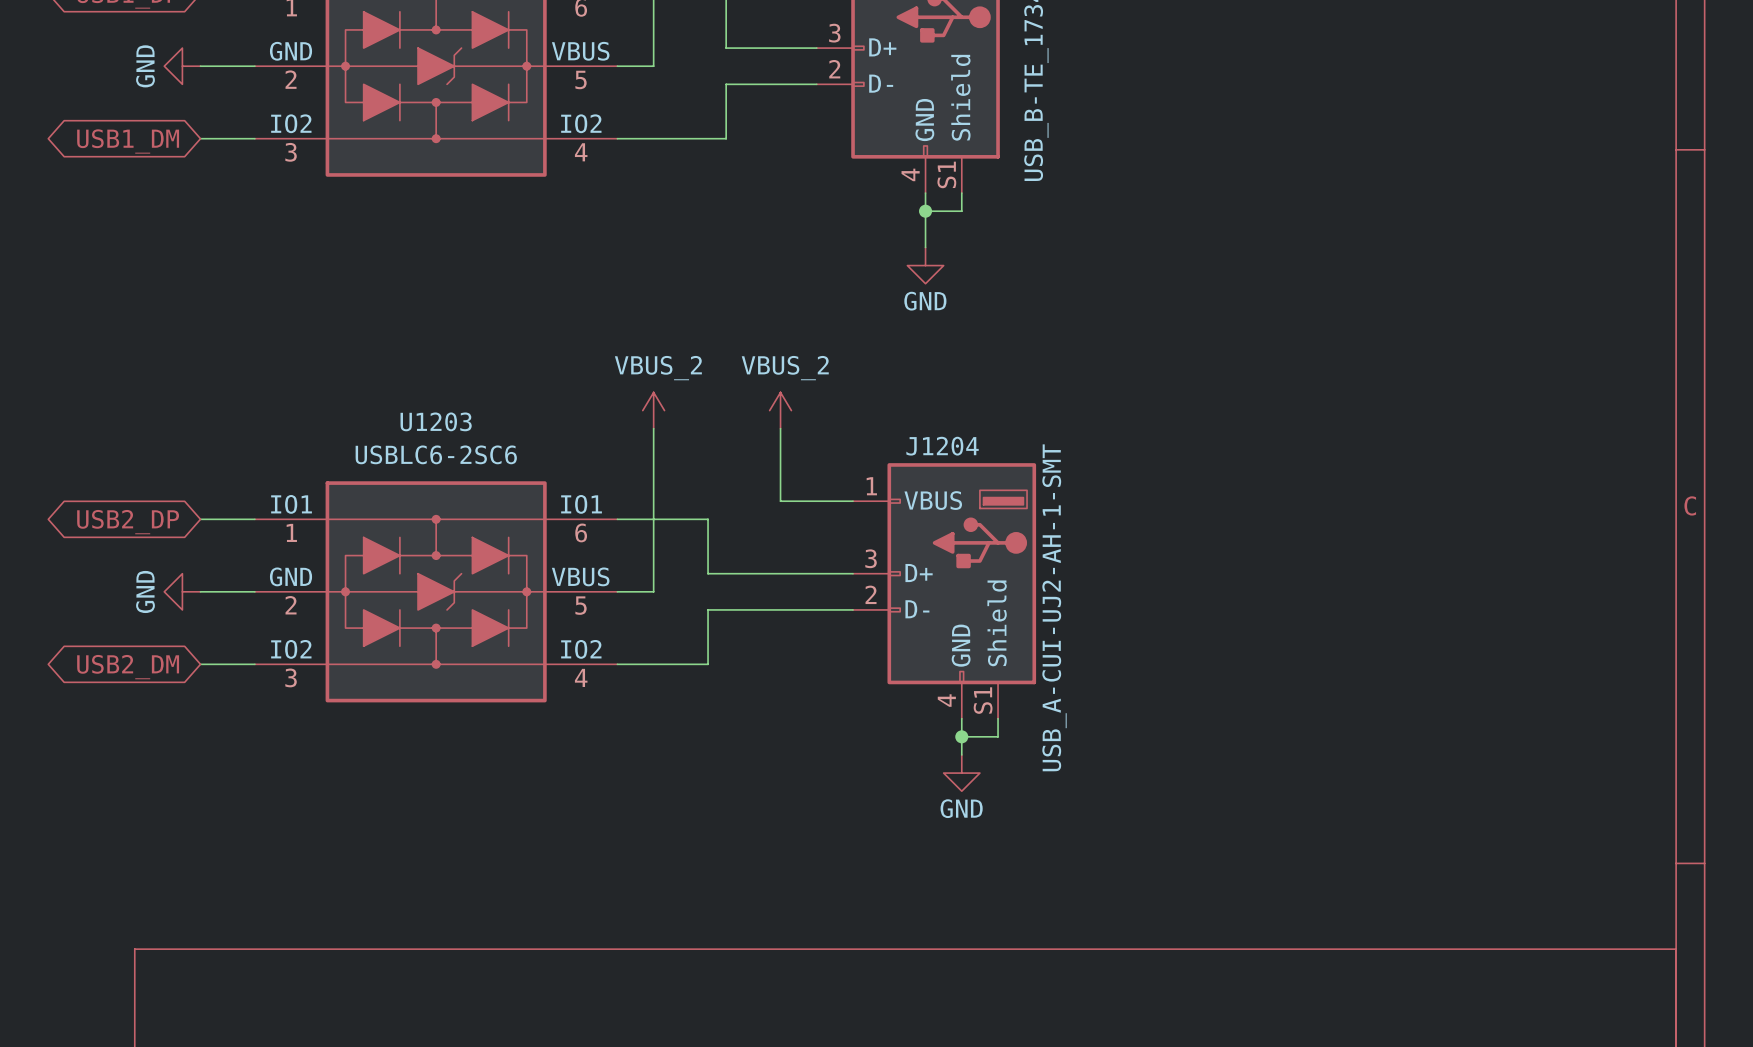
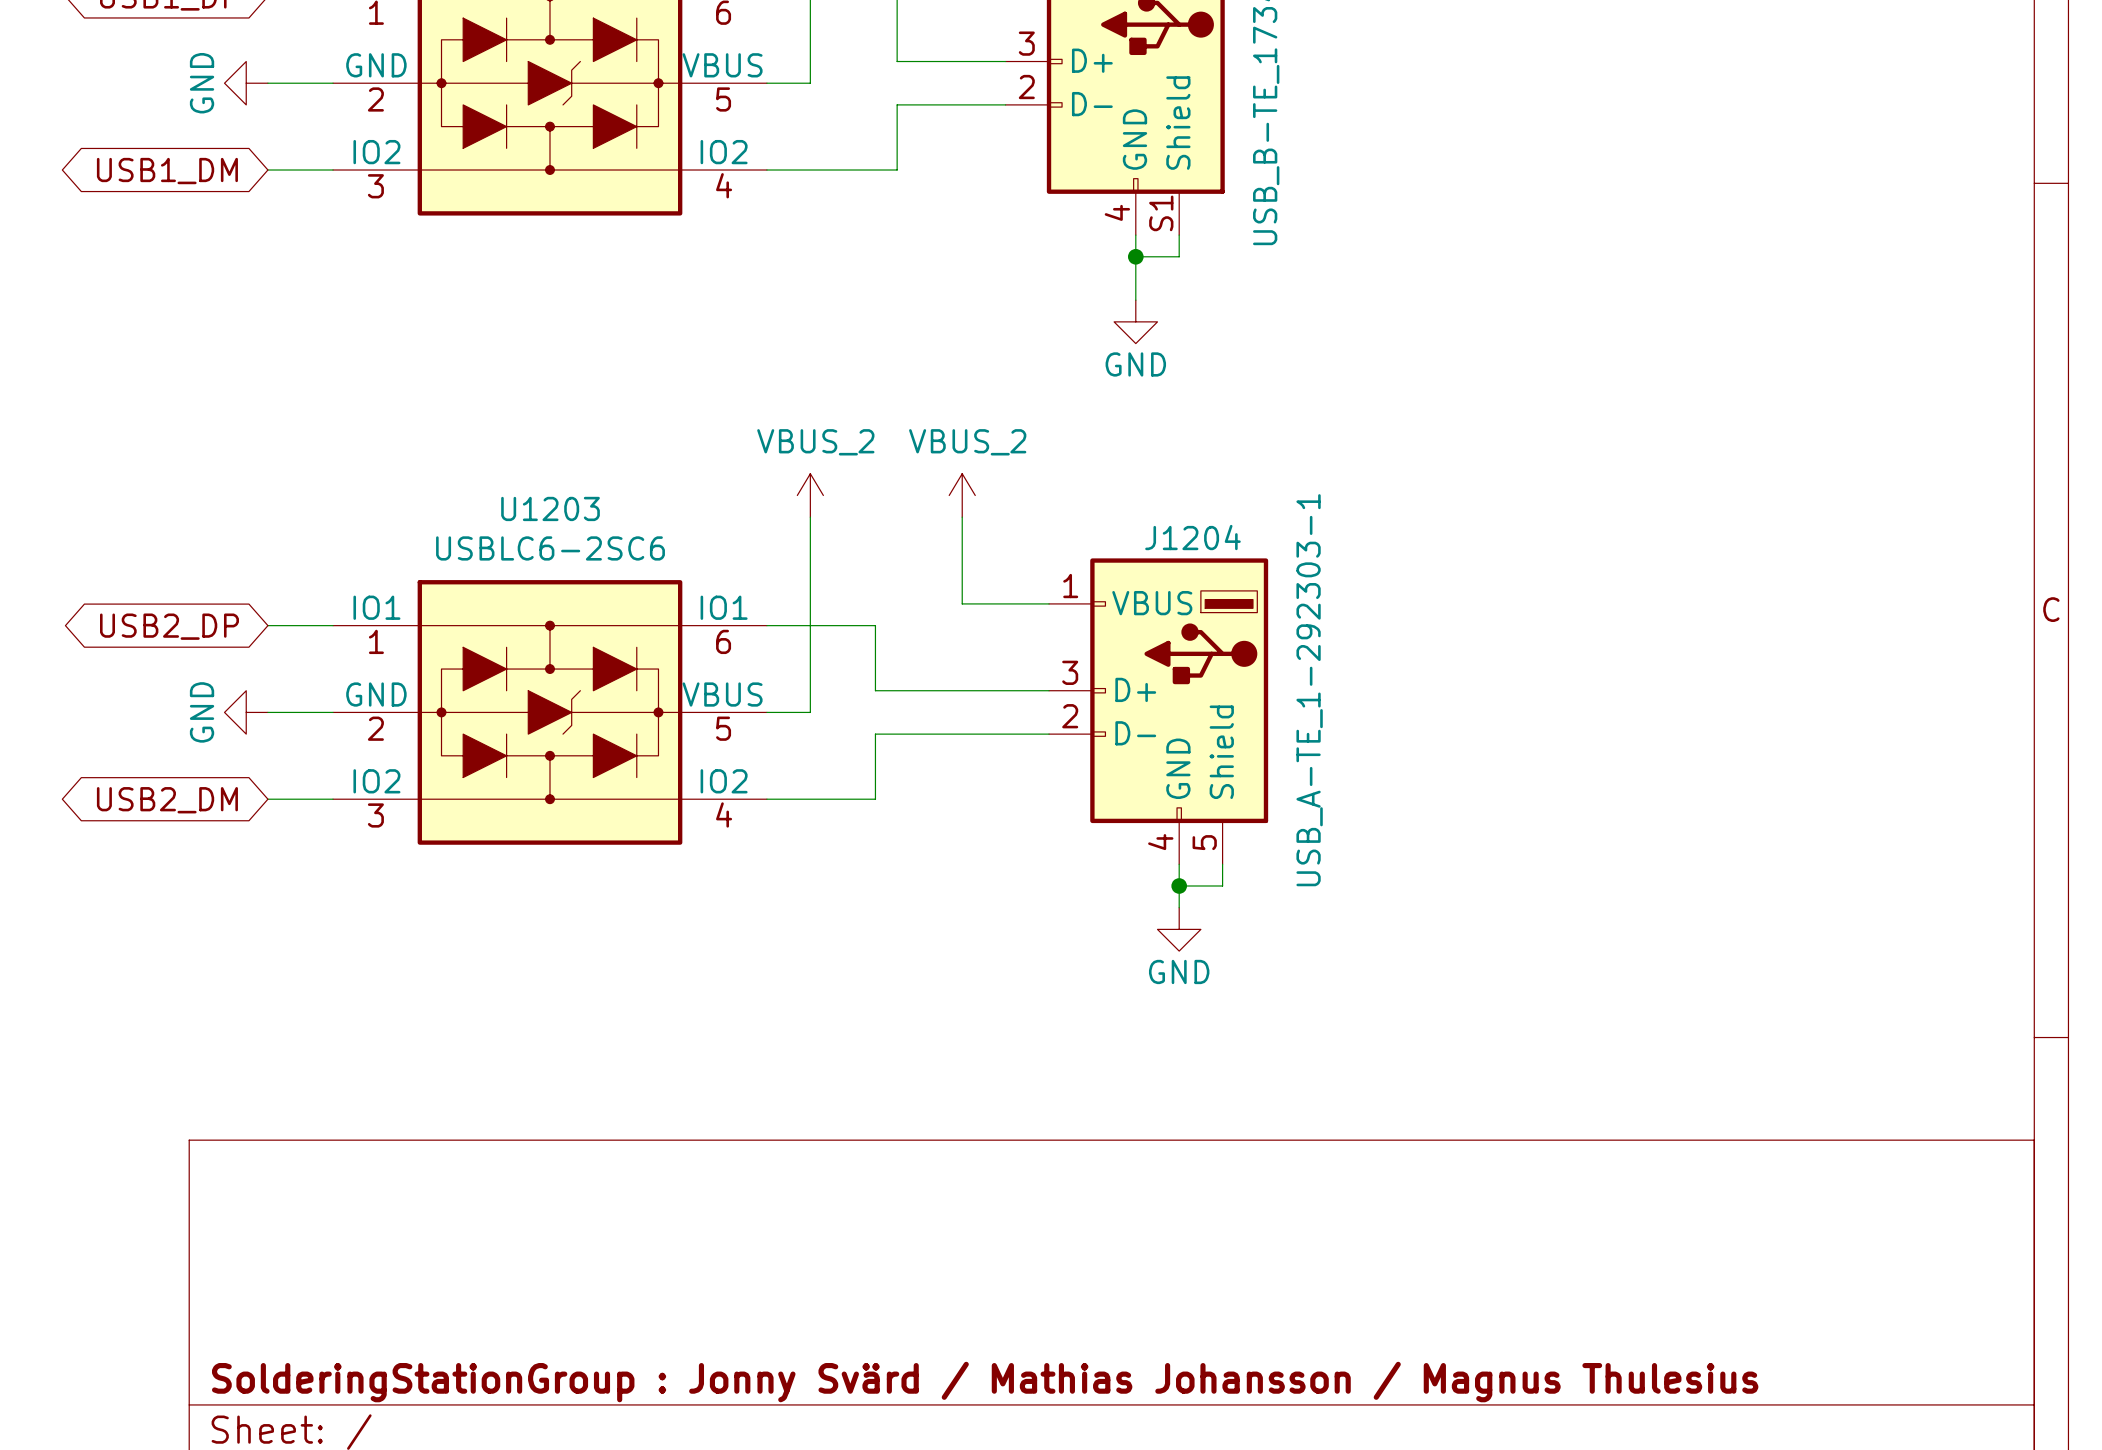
J1204 name position: J1204 (942, 446) -> J1204 (1192, 537)
J1204 value: USB_A-CUI-UJ2-AH-1-SMT (1054, 607) -> USB_A-TE_1-292303-1 (1309, 690)
J1204 pin number: S1 (983, 700) -> 5 (1204, 842)

